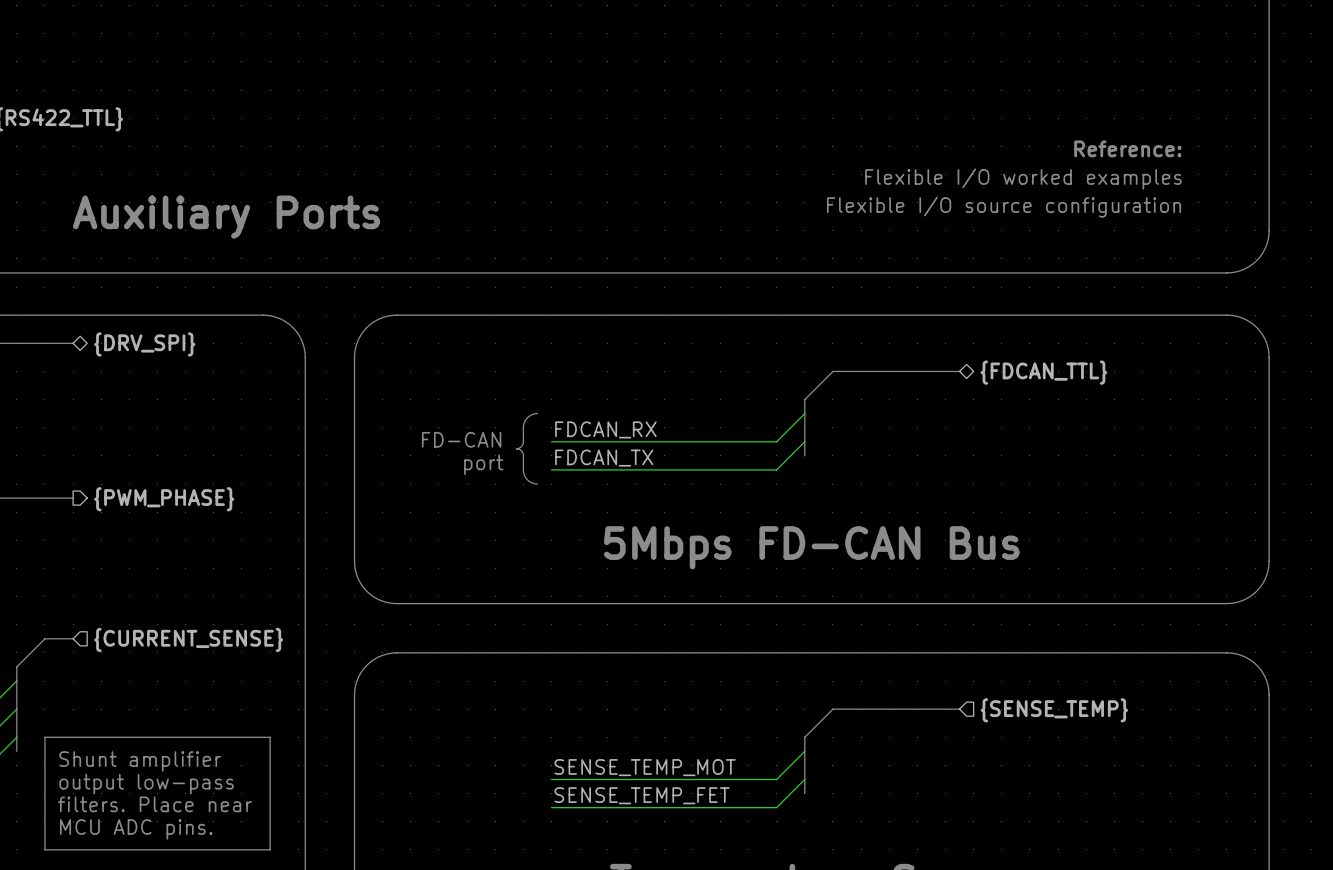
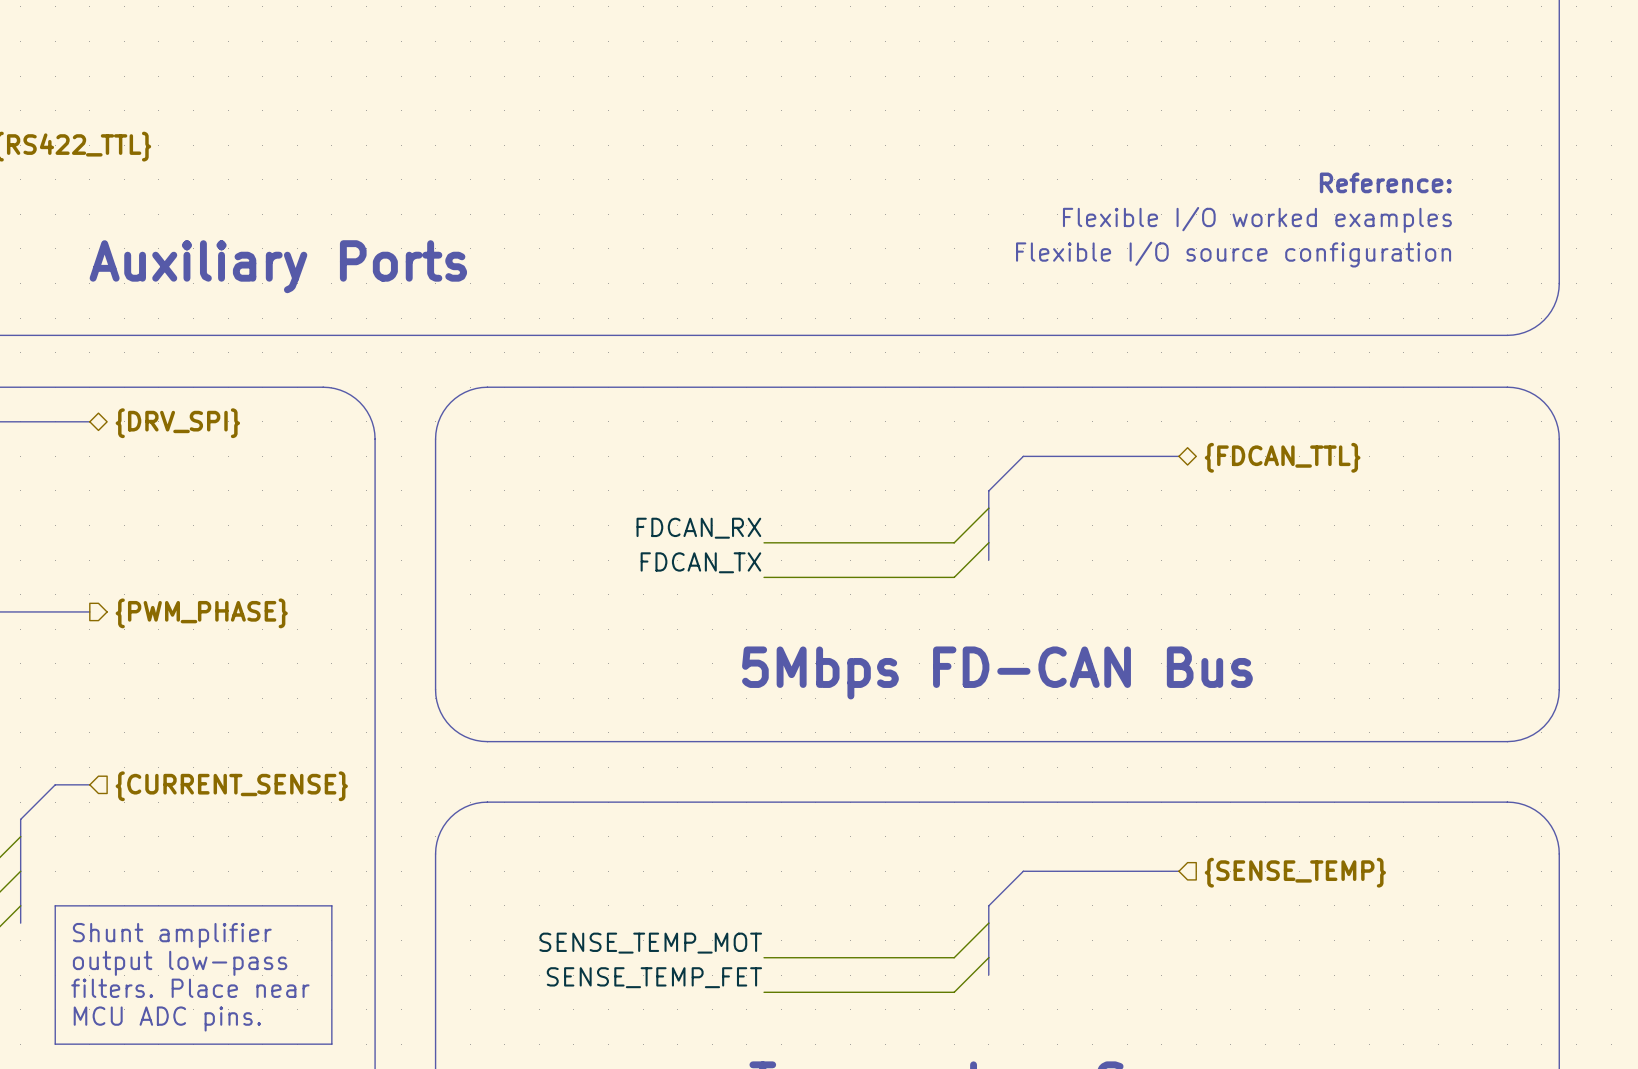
line: (537, 413) (527, 417) (523, 427) -> none
line: (523, 427) (523, 441) -> none
label position: FDCAN_RX (605, 429) -> FDCAN_RX (698, 528)
text: FD-CAN (461, 439) -> none
line: (523, 441) (521, 446) (516, 448) (521, 450) (523, 455) -> none
wire: (551, 441) (621, 441) -> none
line: (523, 455) (525, 476) (530, 482) (537, 484) -> none
label position: FDCAN_TX (604, 458) -> FDCAN_TX (700, 562)
text: port (483, 464) -> none
wire: (551, 469) (621, 469) -> none
label position: SENSE_TEMP_MOT (645, 767) -> SENSE_TEMP_MOT (650, 943)
wire: (551, 779) (621, 779) -> none
label position: SENSE_TEMP_FET (642, 795) -> SENSE_TEMP_FET (654, 977)
wire: (551, 807) (621, 807) -> none

